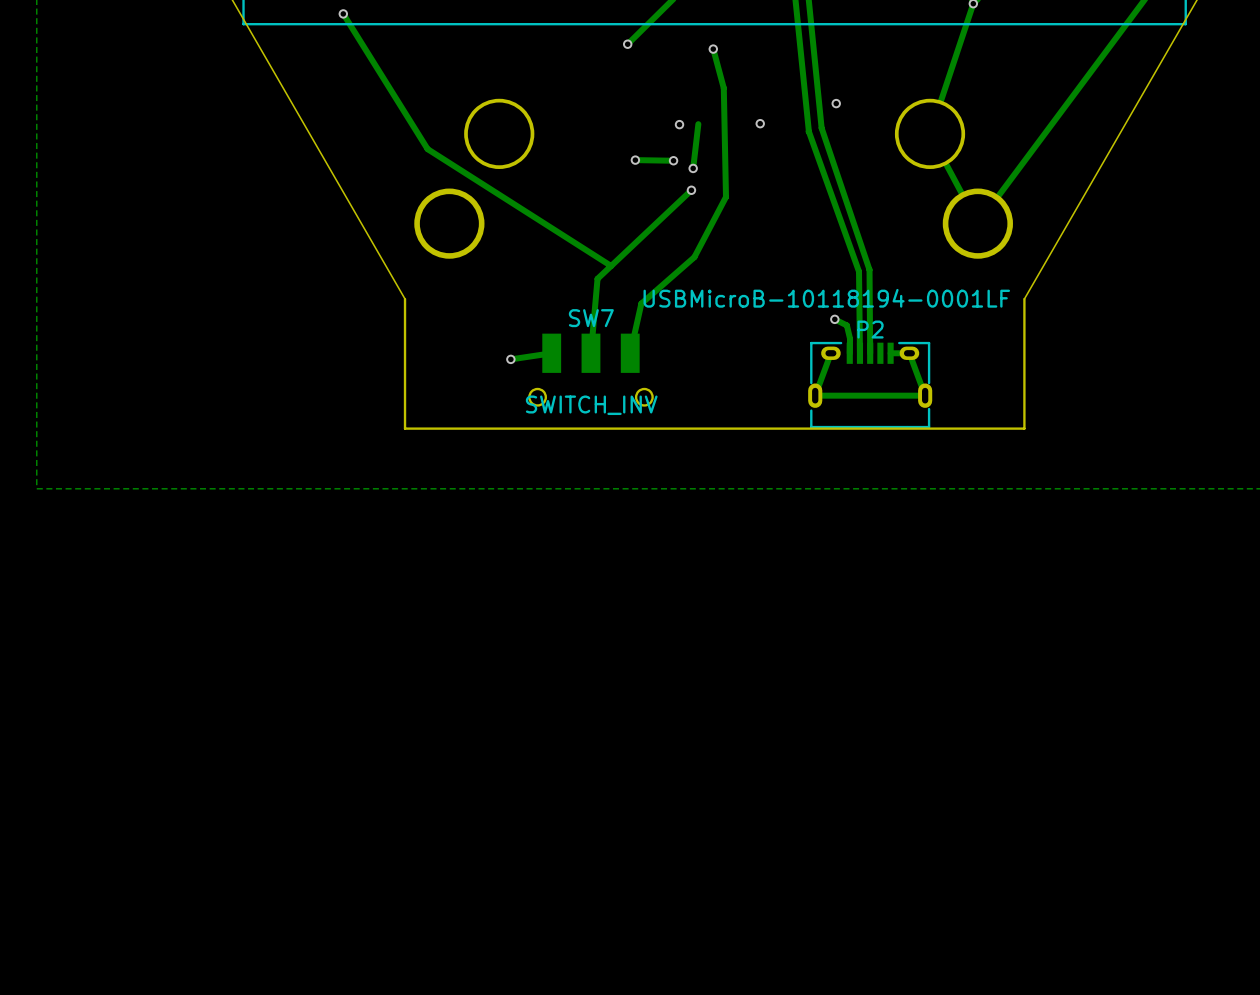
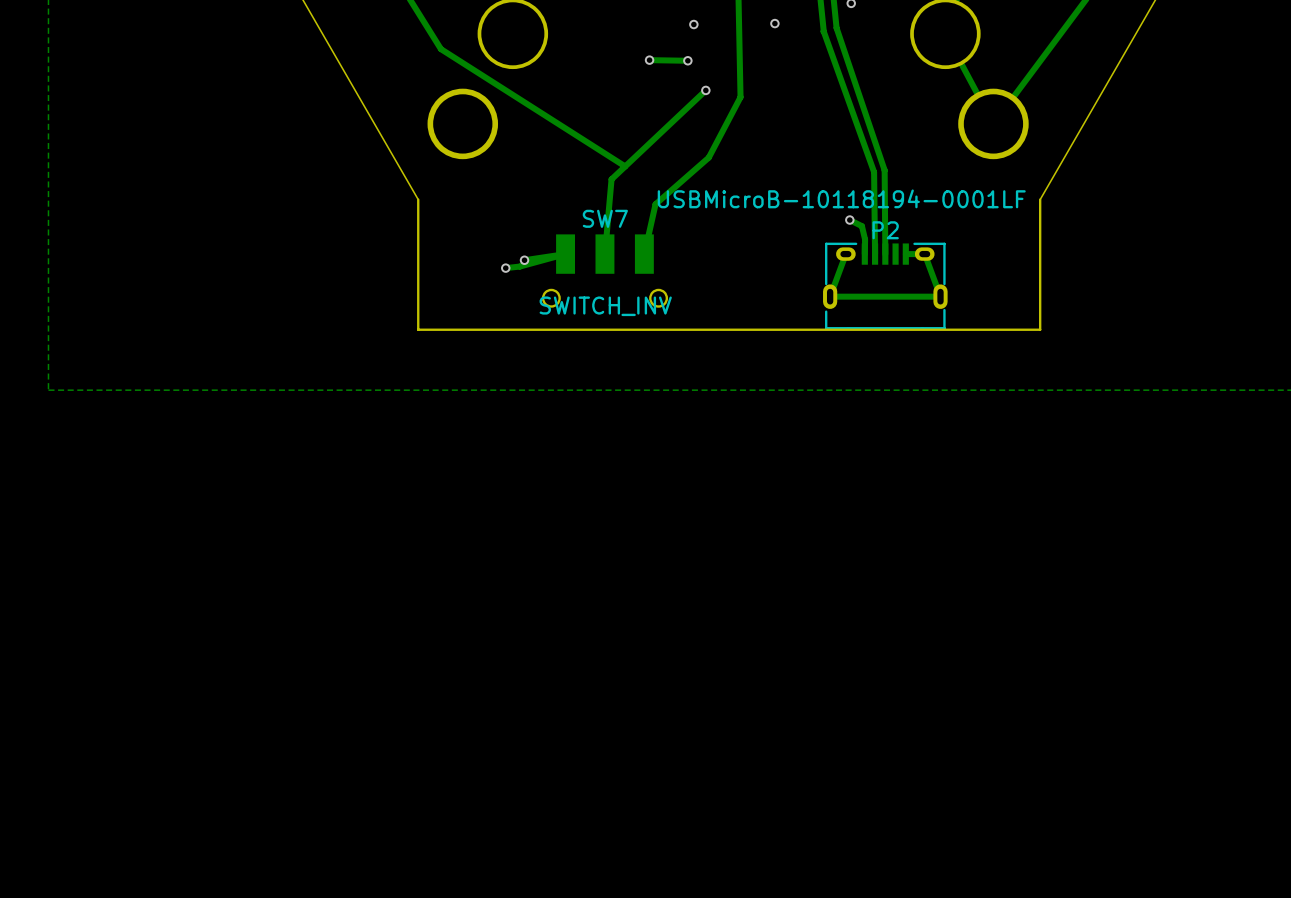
track: (698, 124) (693, 168) -> none
via: (693, 168) -> none
track: none -> (565, 254) (519, 266) (505, 268)
via: none -> (505, 268)

